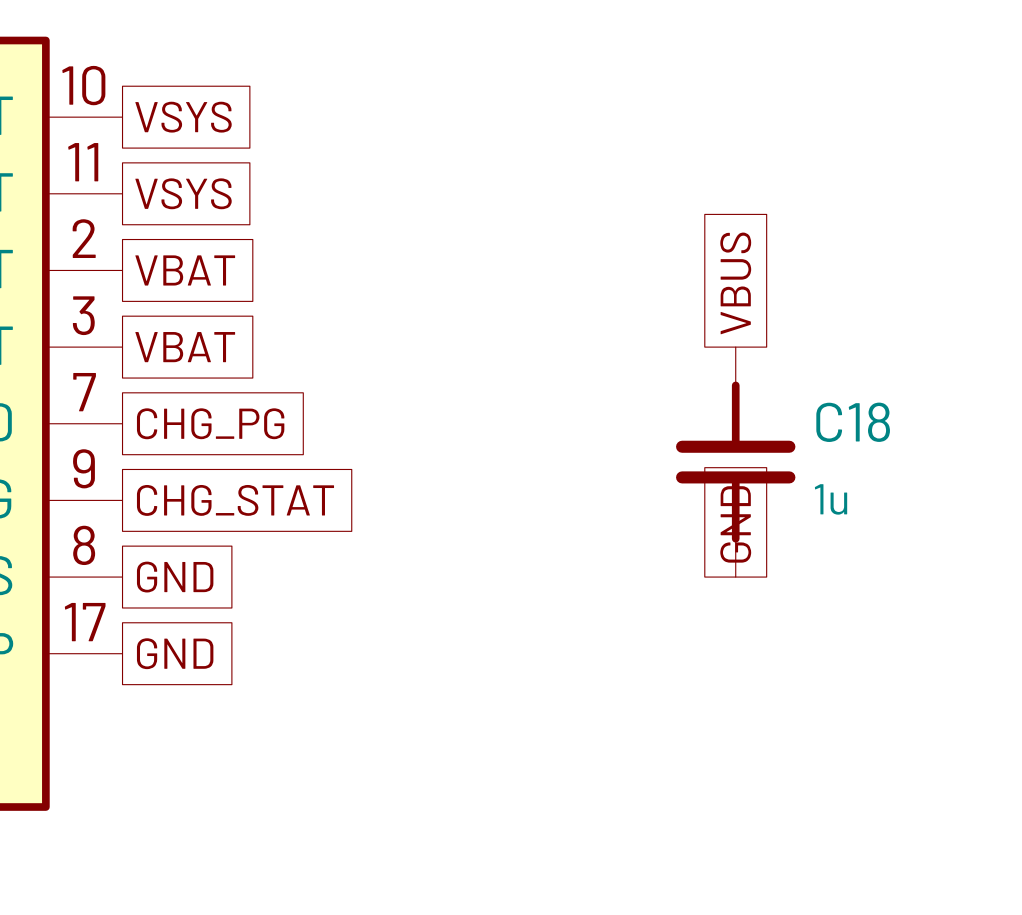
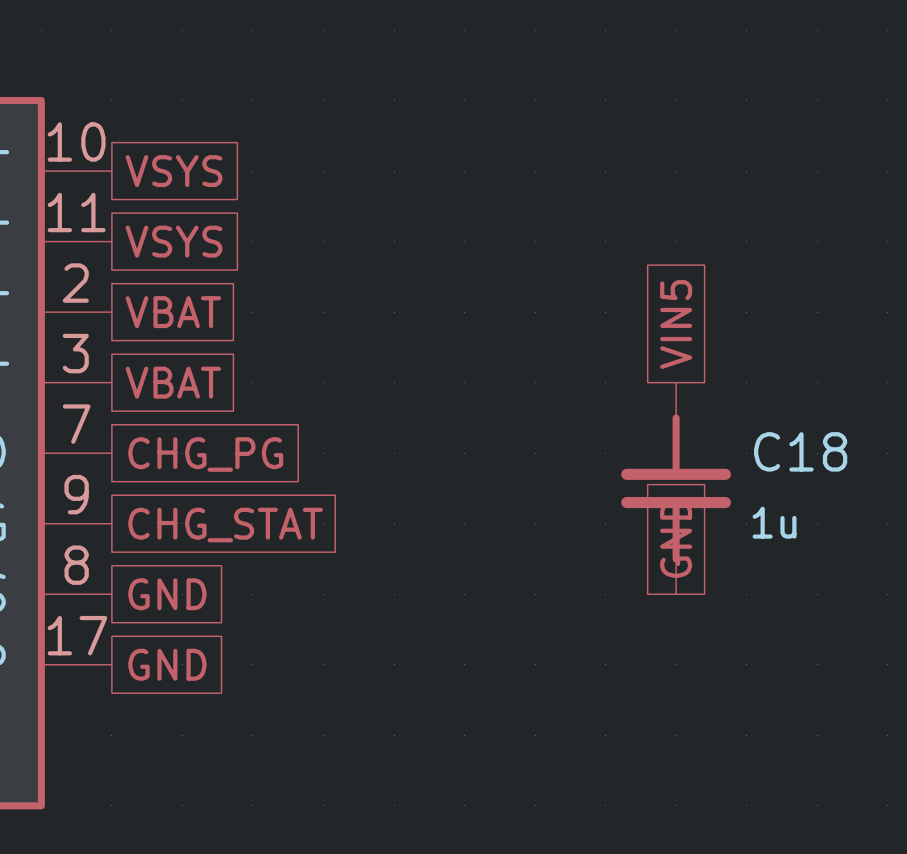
global label: VBUS (735, 283) -> VIN5 (676, 324)

